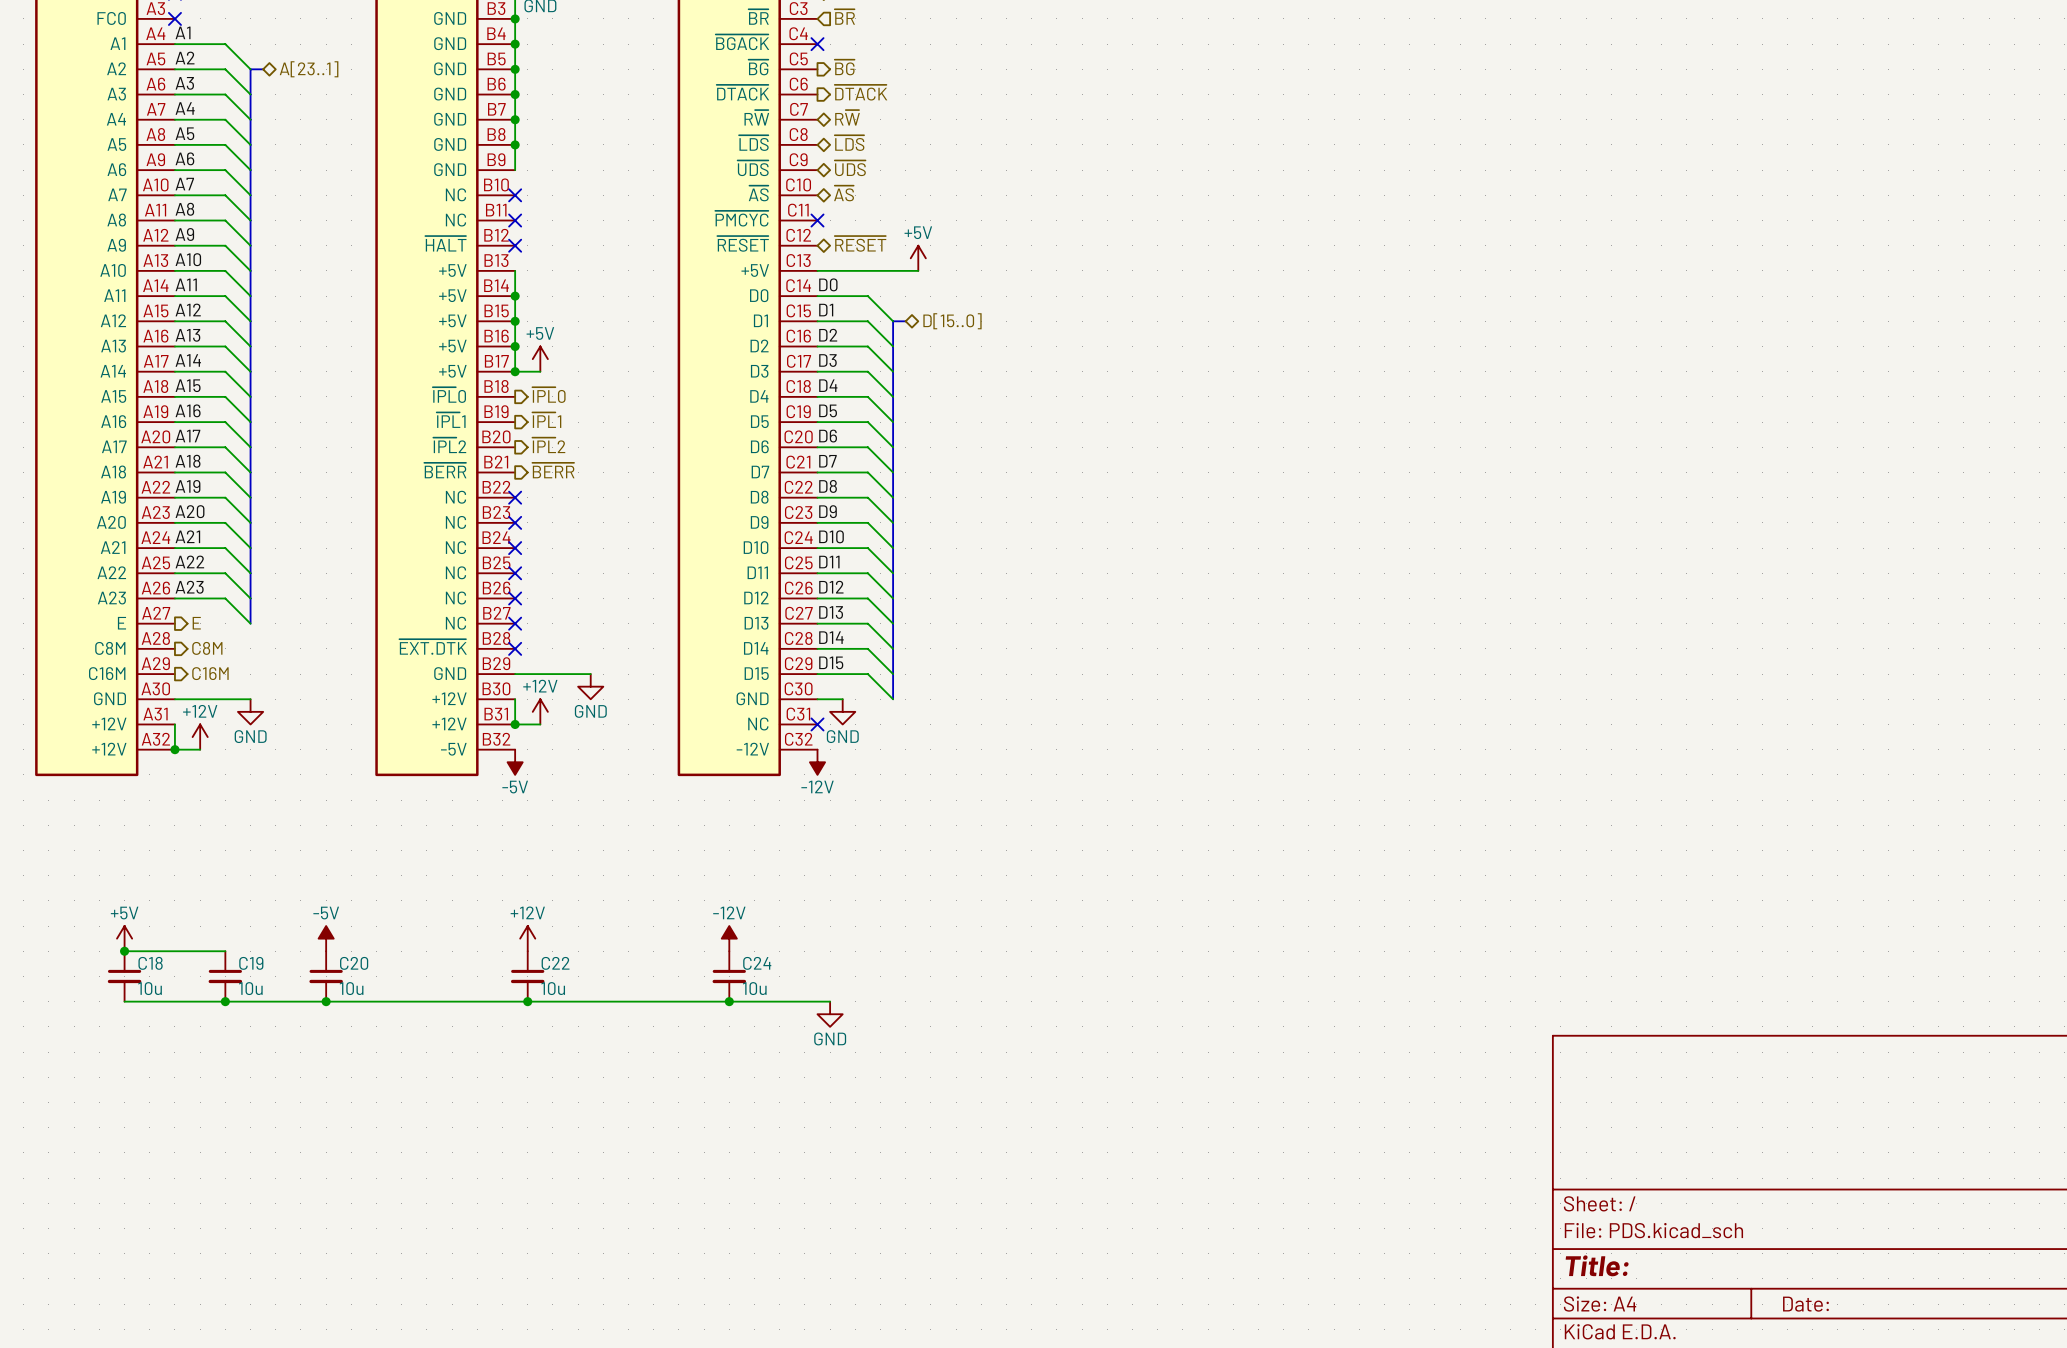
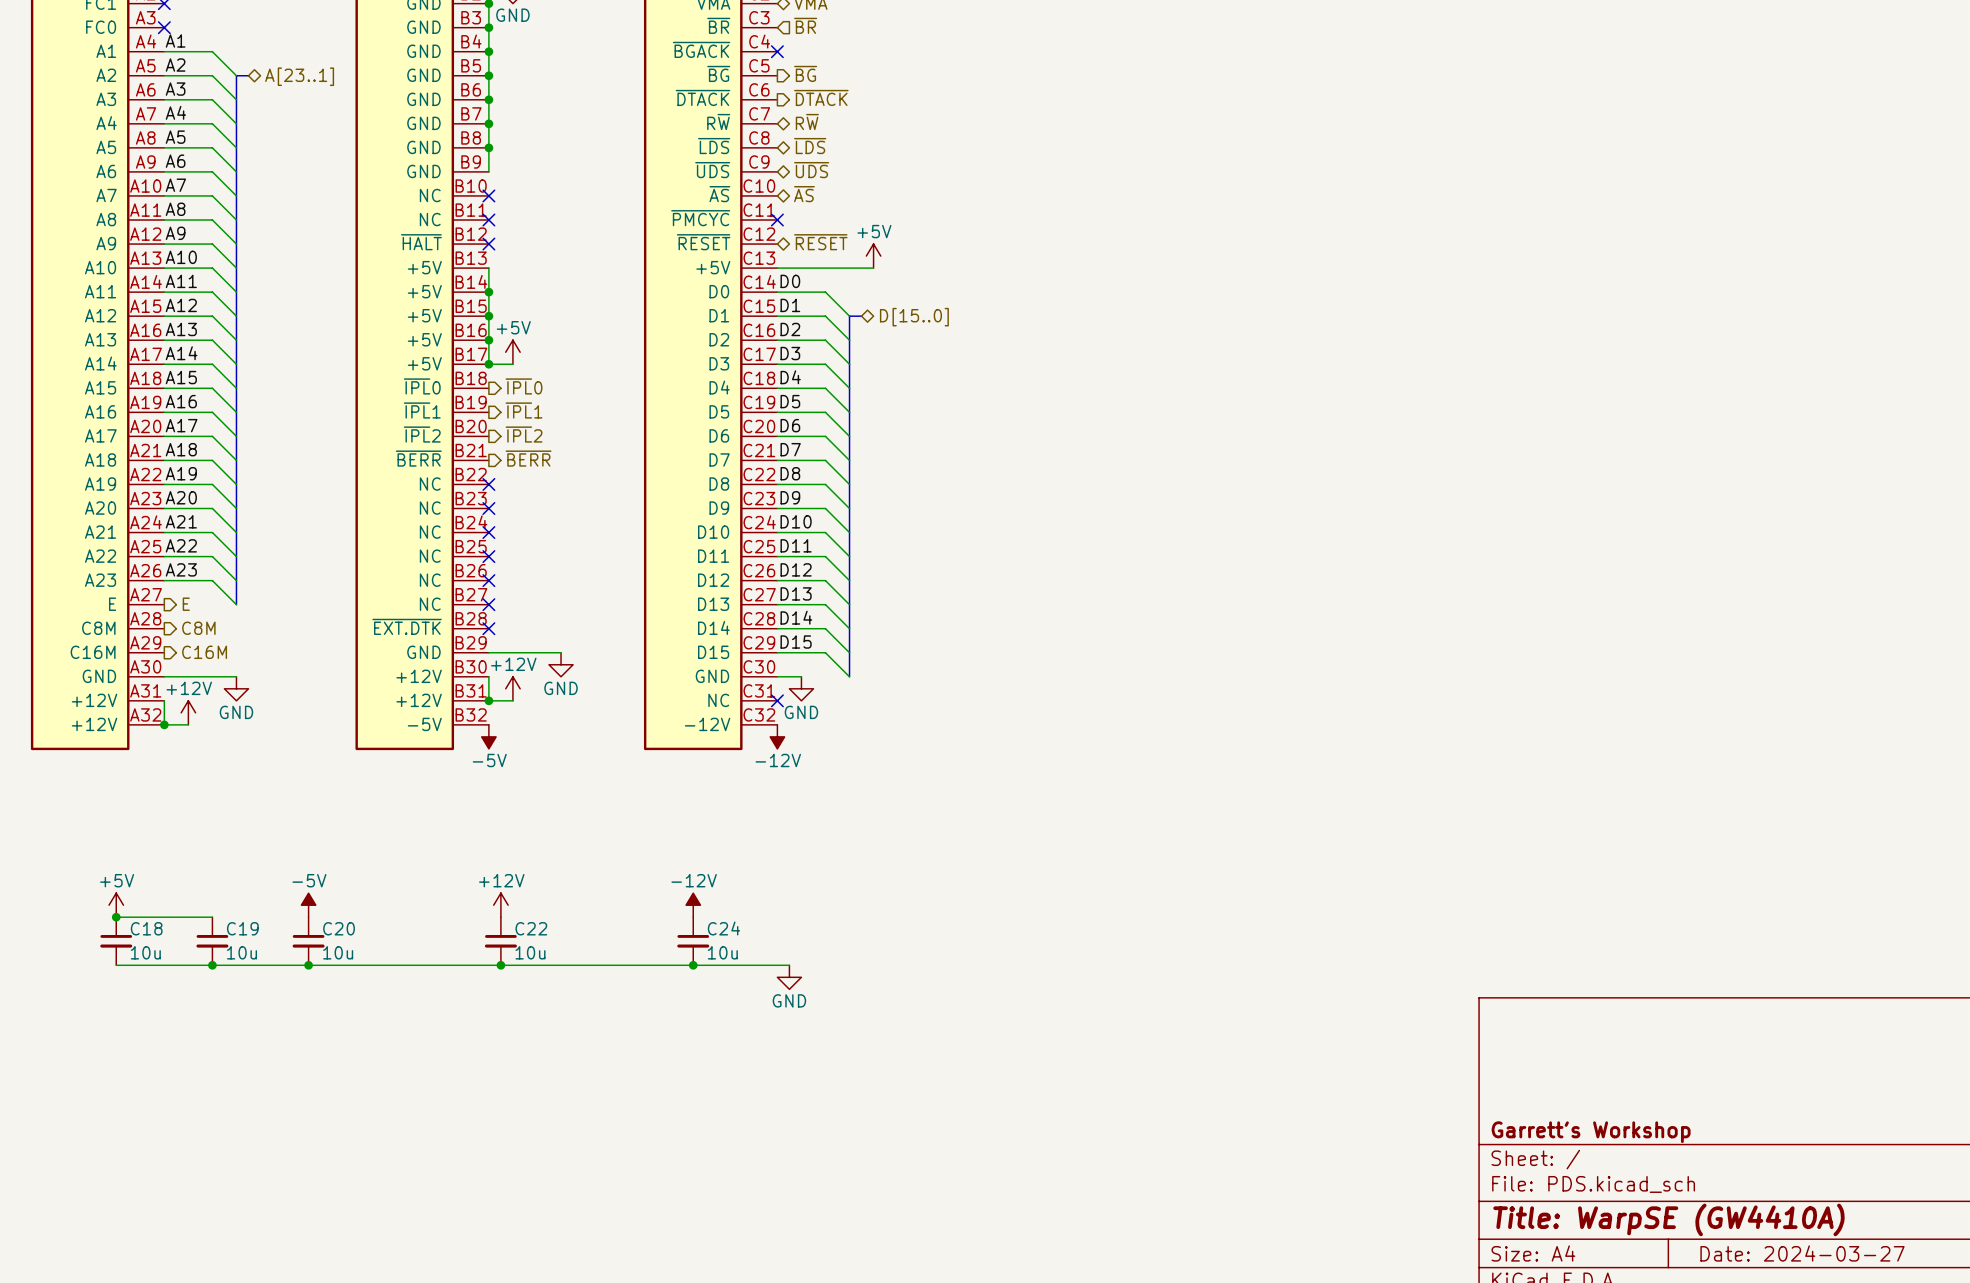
title block: none -> Garrett's Workshop (1591, 1132)
title block: Title: (1597, 1265) -> Title: WarpSE (GW4410A) (1668, 1219)
title block: Date: (1805, 1304) -> Date: 2024-03-27 (1802, 1253)

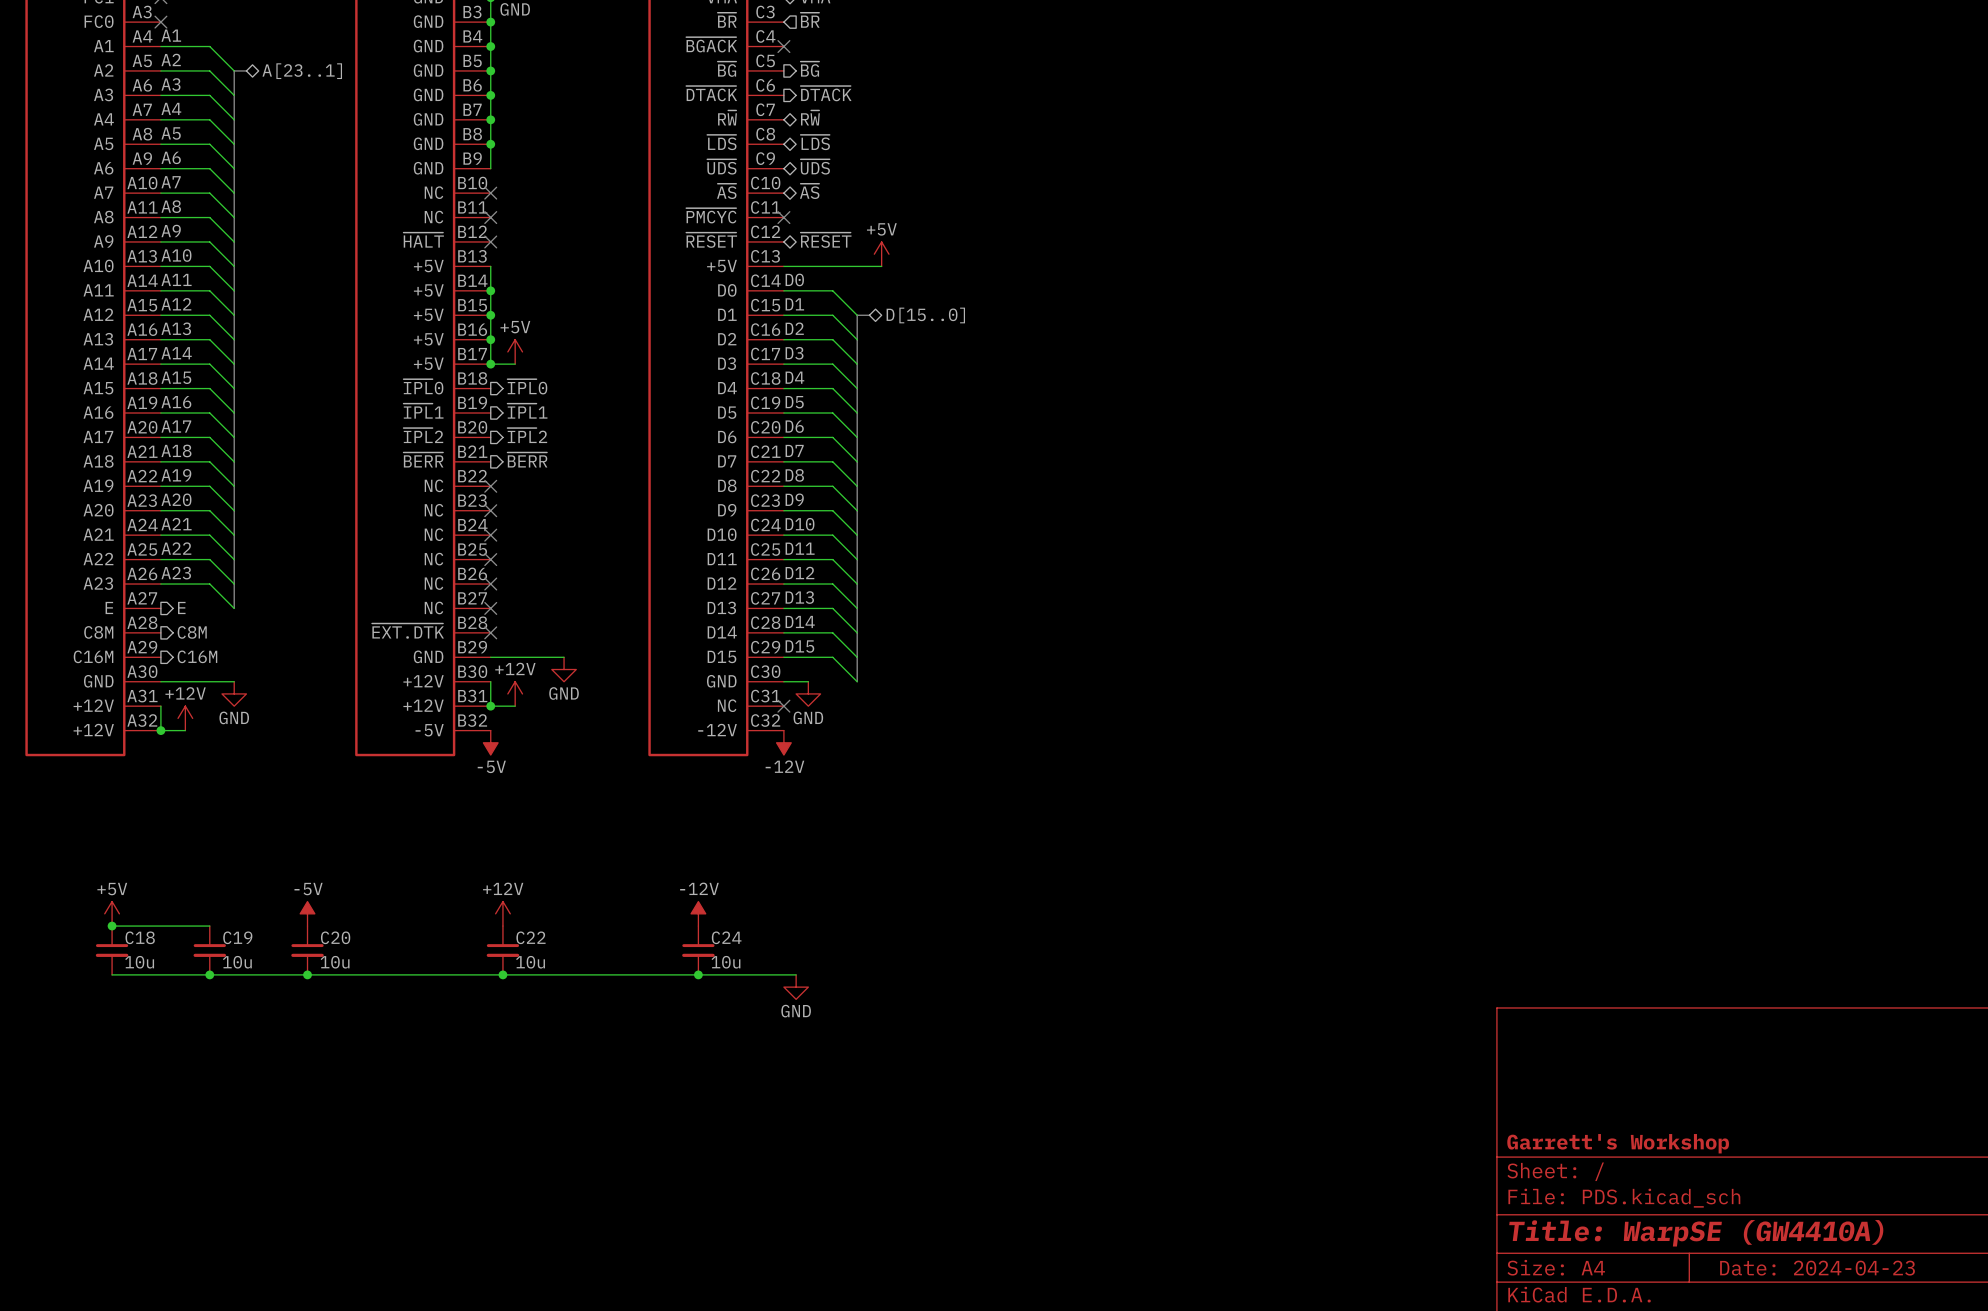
title block: Date: 2024-03-27 (1802, 1253) -> Date: 2024-04-23 (1817, 1268)

